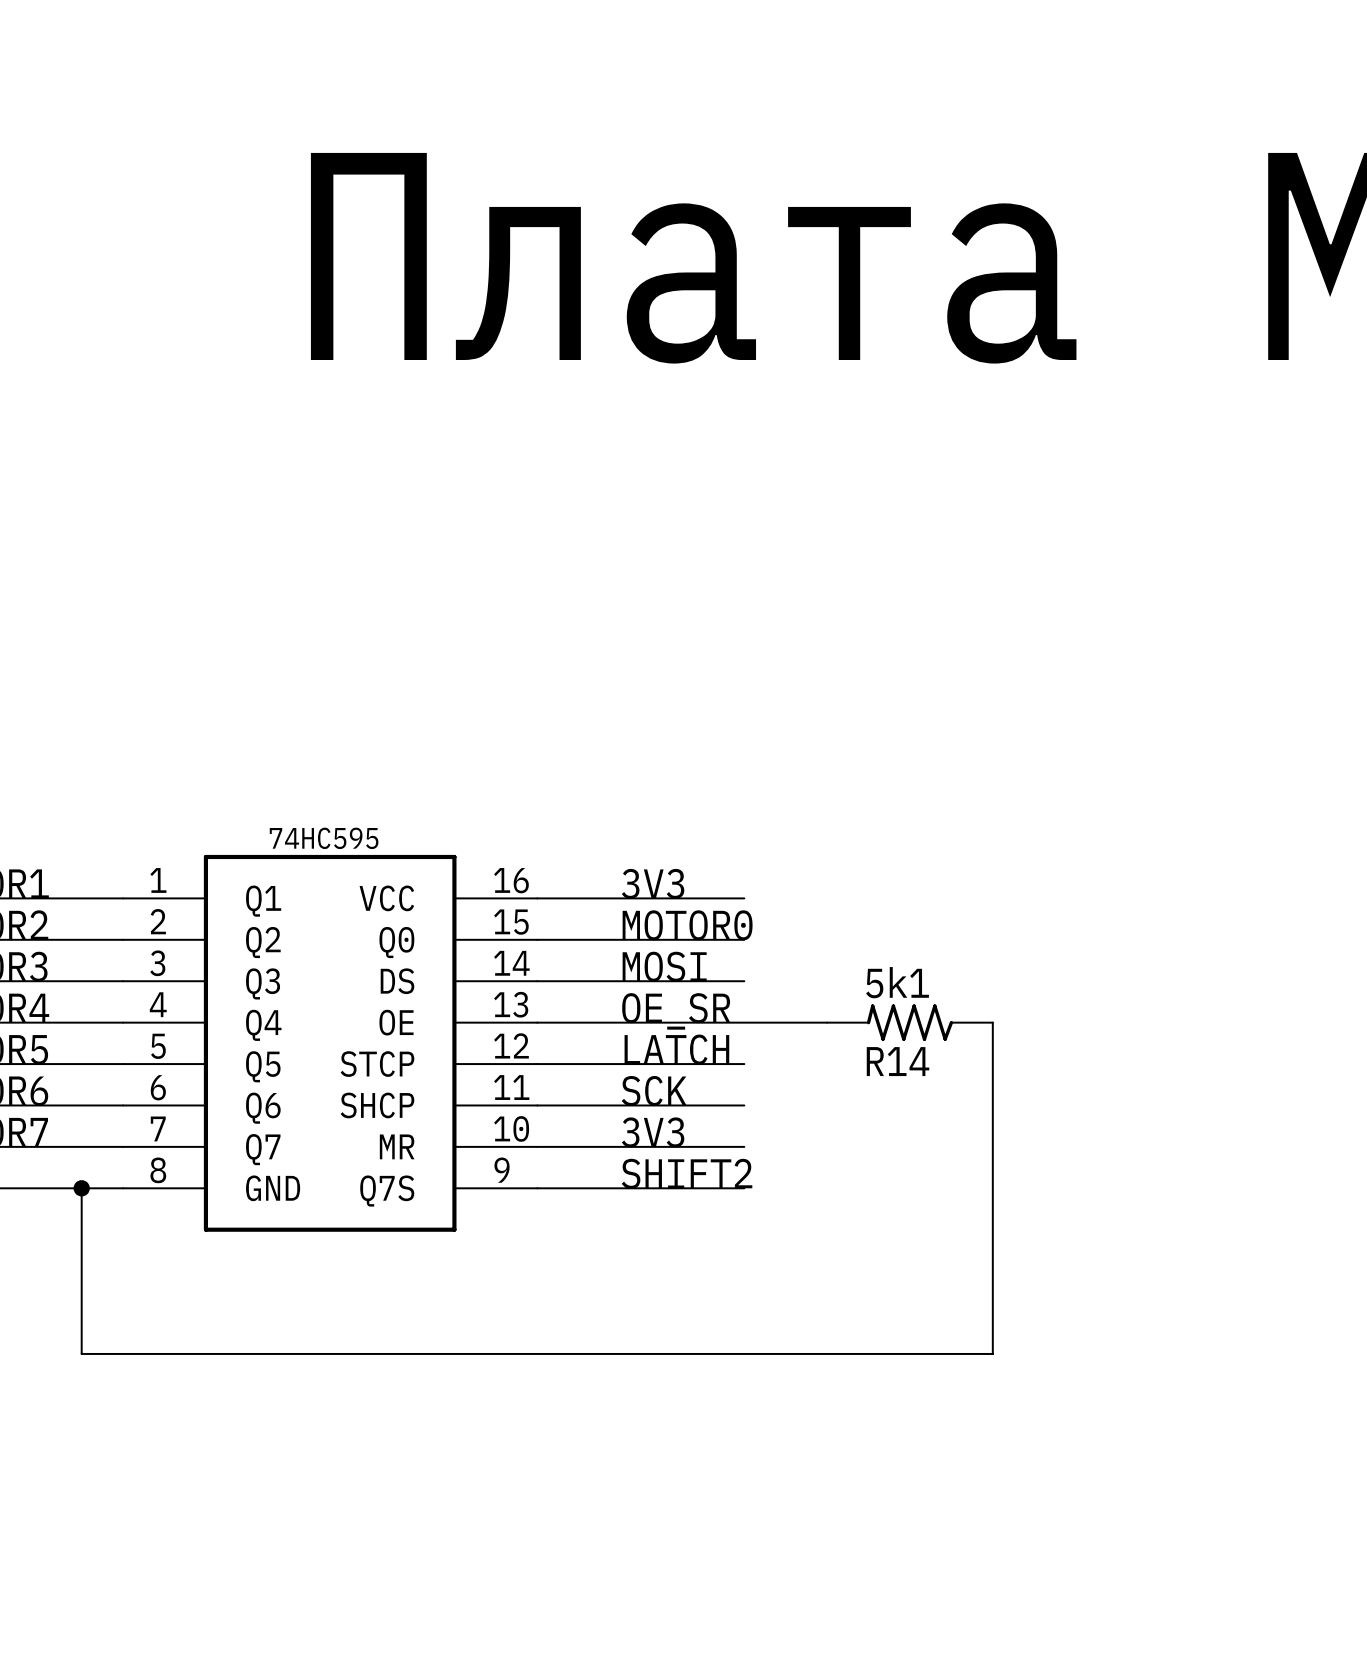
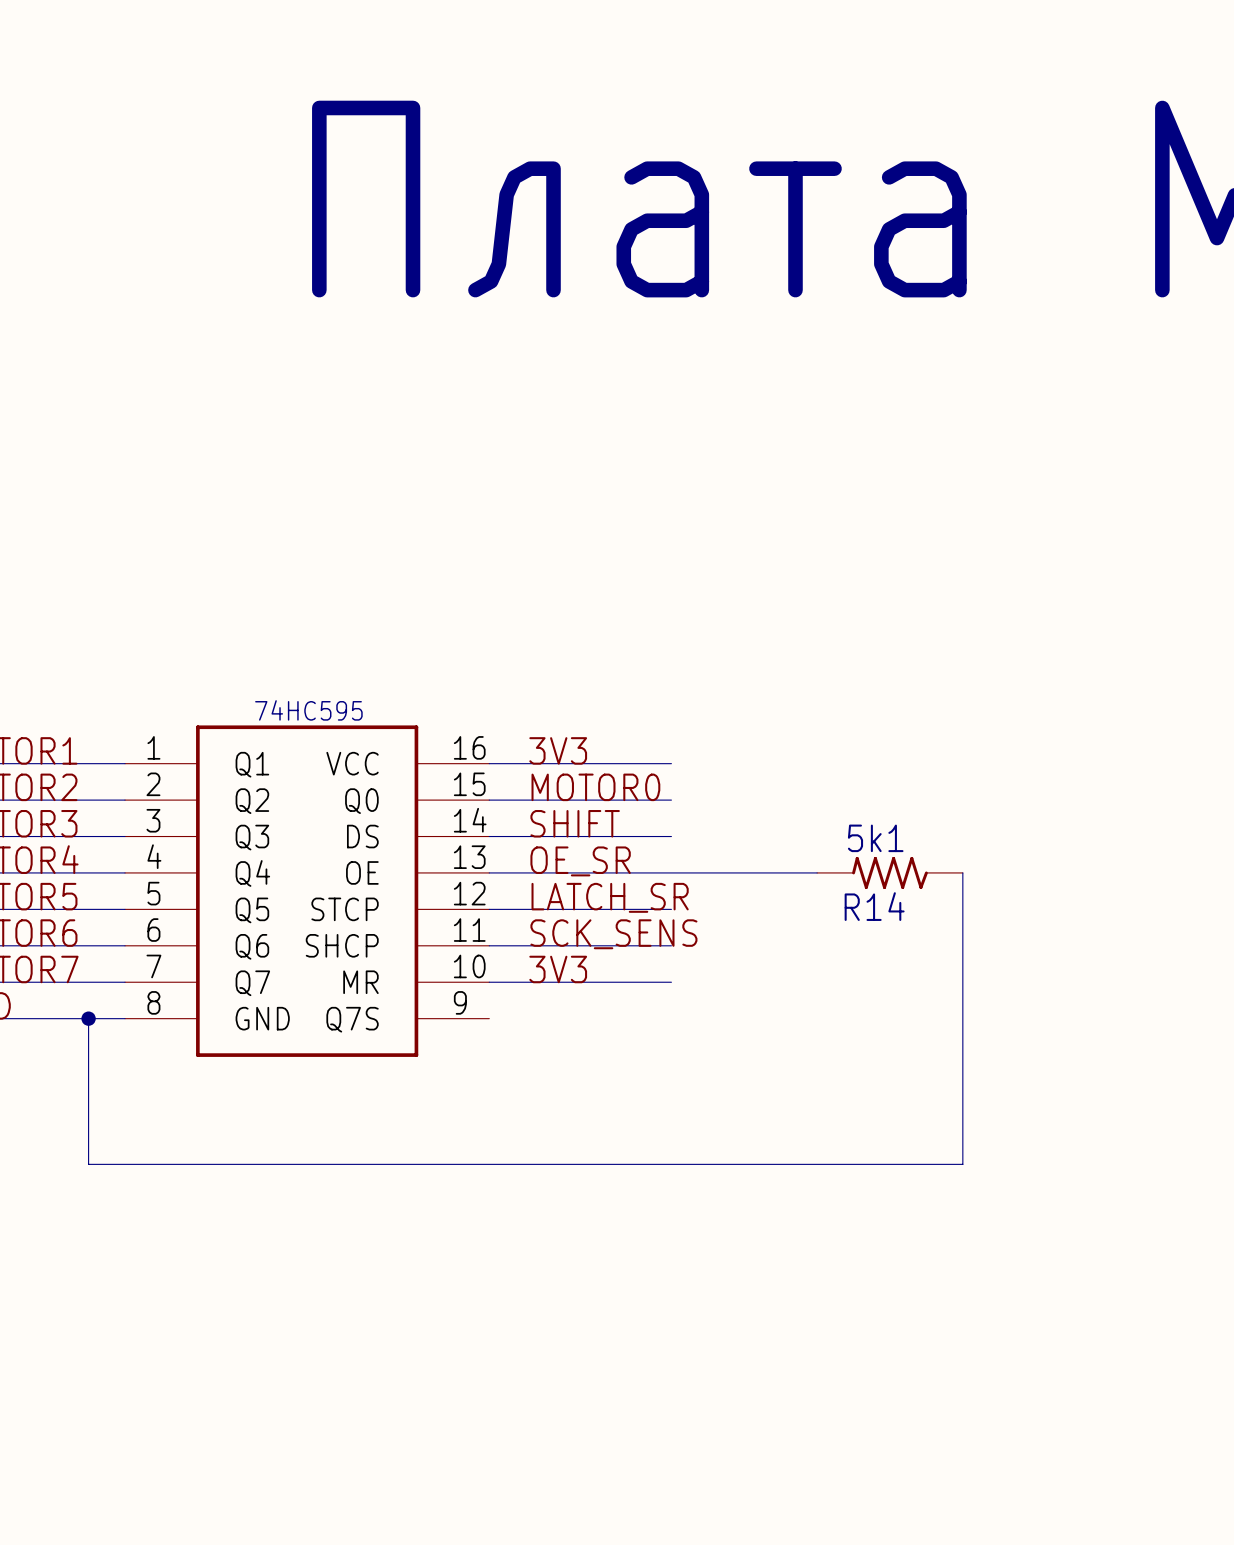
label position: 3V3 (653, 883) -> 3V3 (558, 750)
label position: MOTOR0 (687, 925) -> MOTOR0 (595, 787)
label: none -> SHIFT (575, 823)
label: MOSI (664, 966) -> none
label position: OE_SR (676, 1011) -> OE_SR (580, 861)
R14 position: (909, 1022) -> (889, 872)
wire: (992, 1022) (992, 1353) -> (962, 872) (962, 1164) (889, 1164)
label: LATCH (676, 1049) -> LATCH_SR (610, 897)
label: SCK (654, 1090) -> none
label: none -> SCK_SENS (613, 934)
label position: 3V3 (653, 1132) -> 3V3 (558, 969)
label: SHIFT2 (687, 1173) -> none
wire: (537, 1188) (744, 1188) -> none

